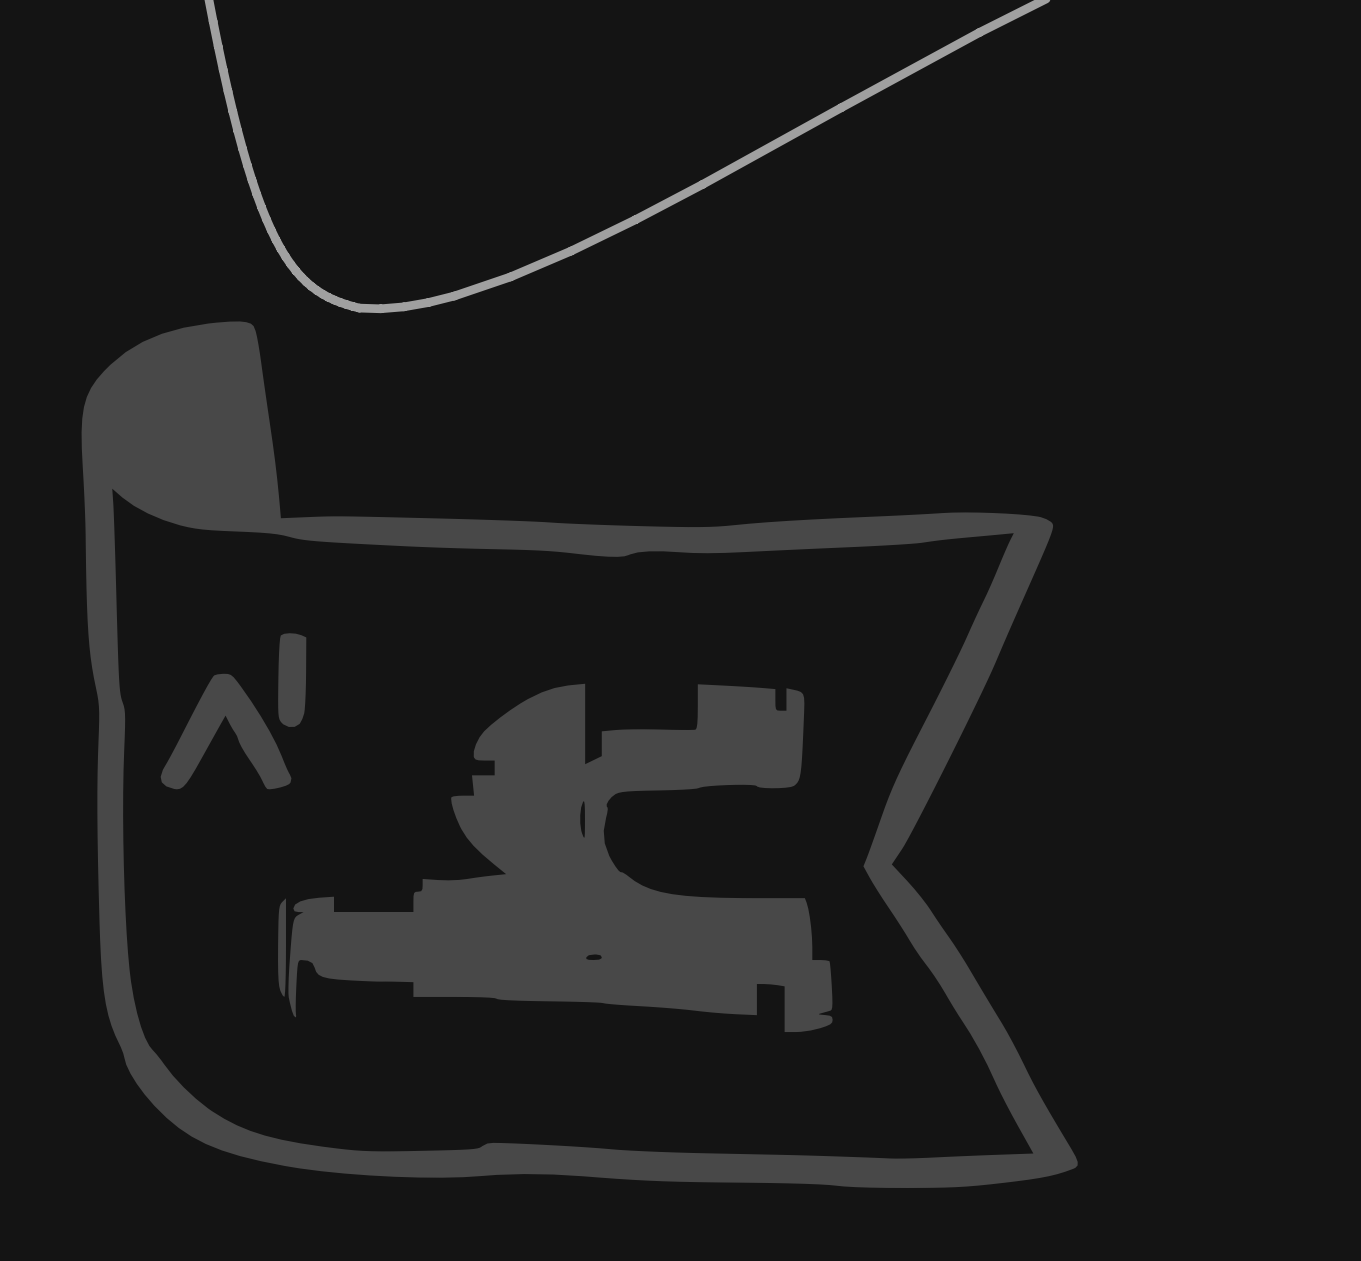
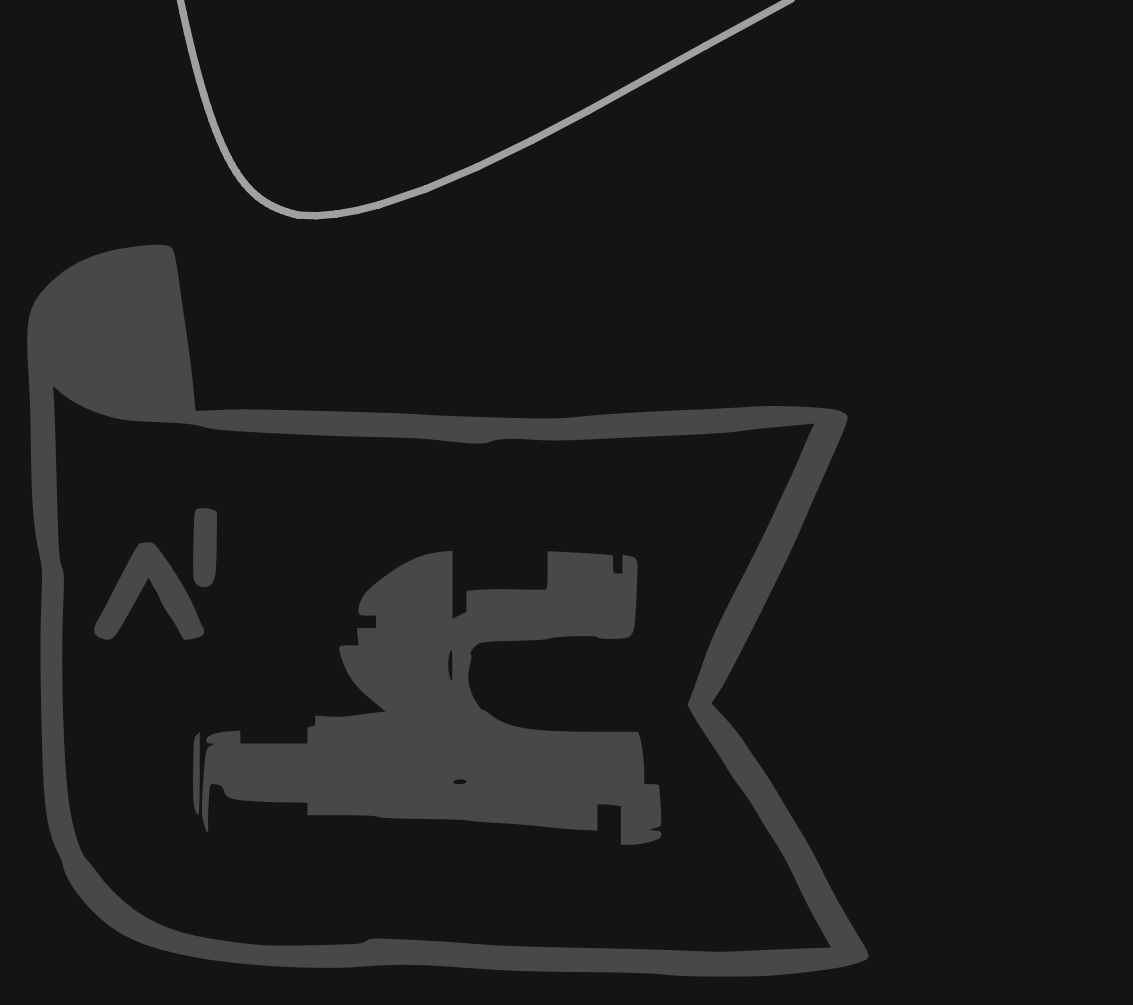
drawing position: (579, 754) -> (447, 610)

